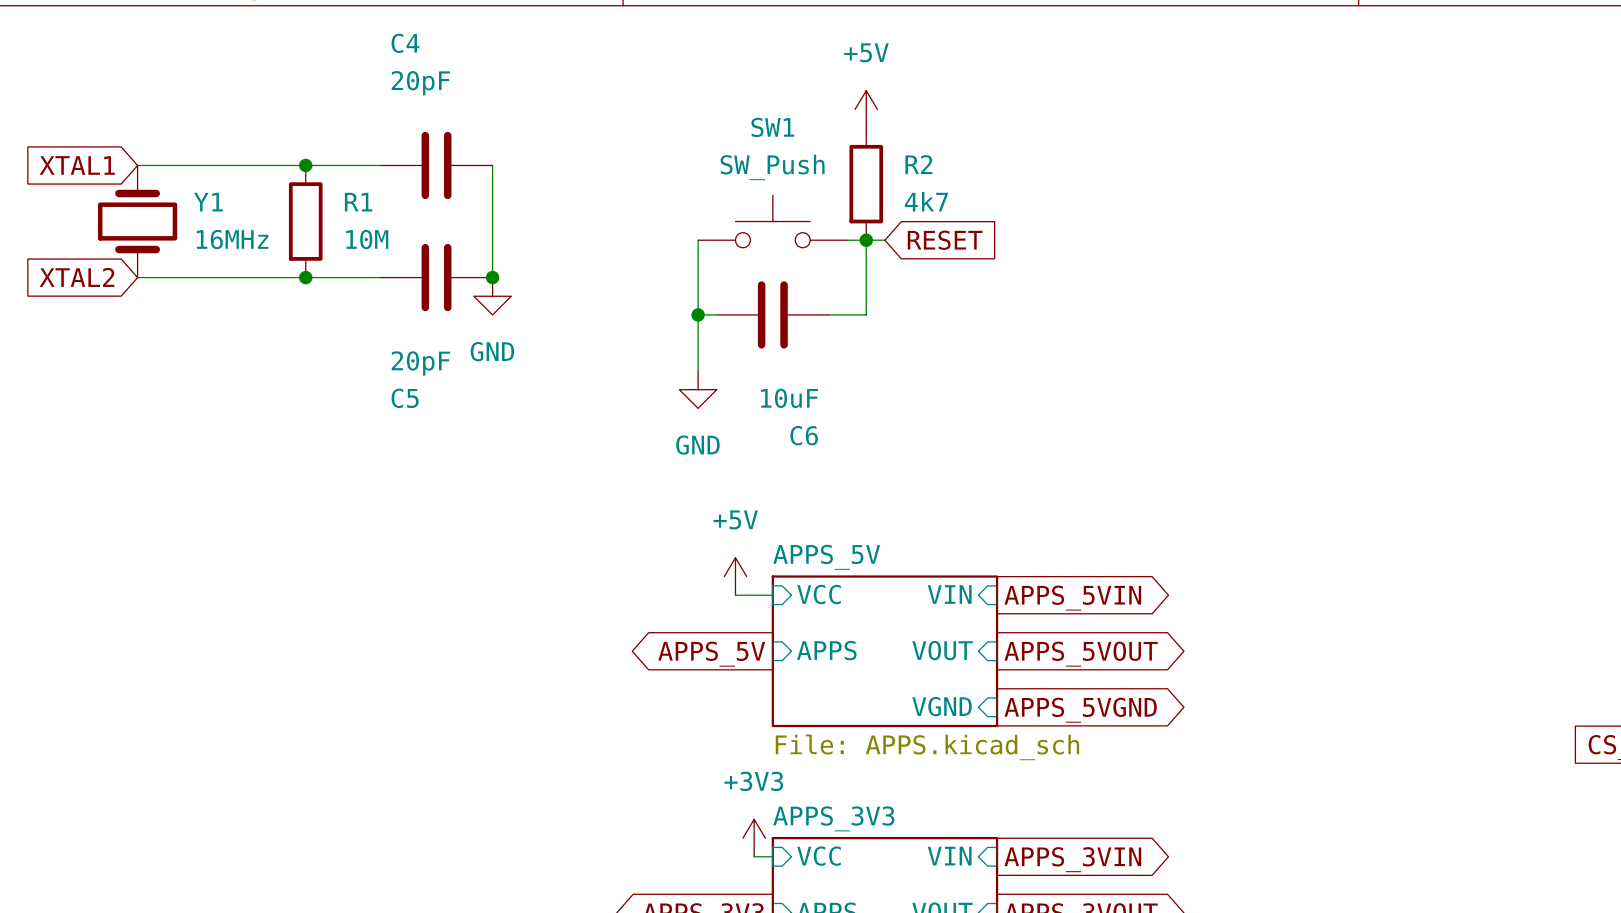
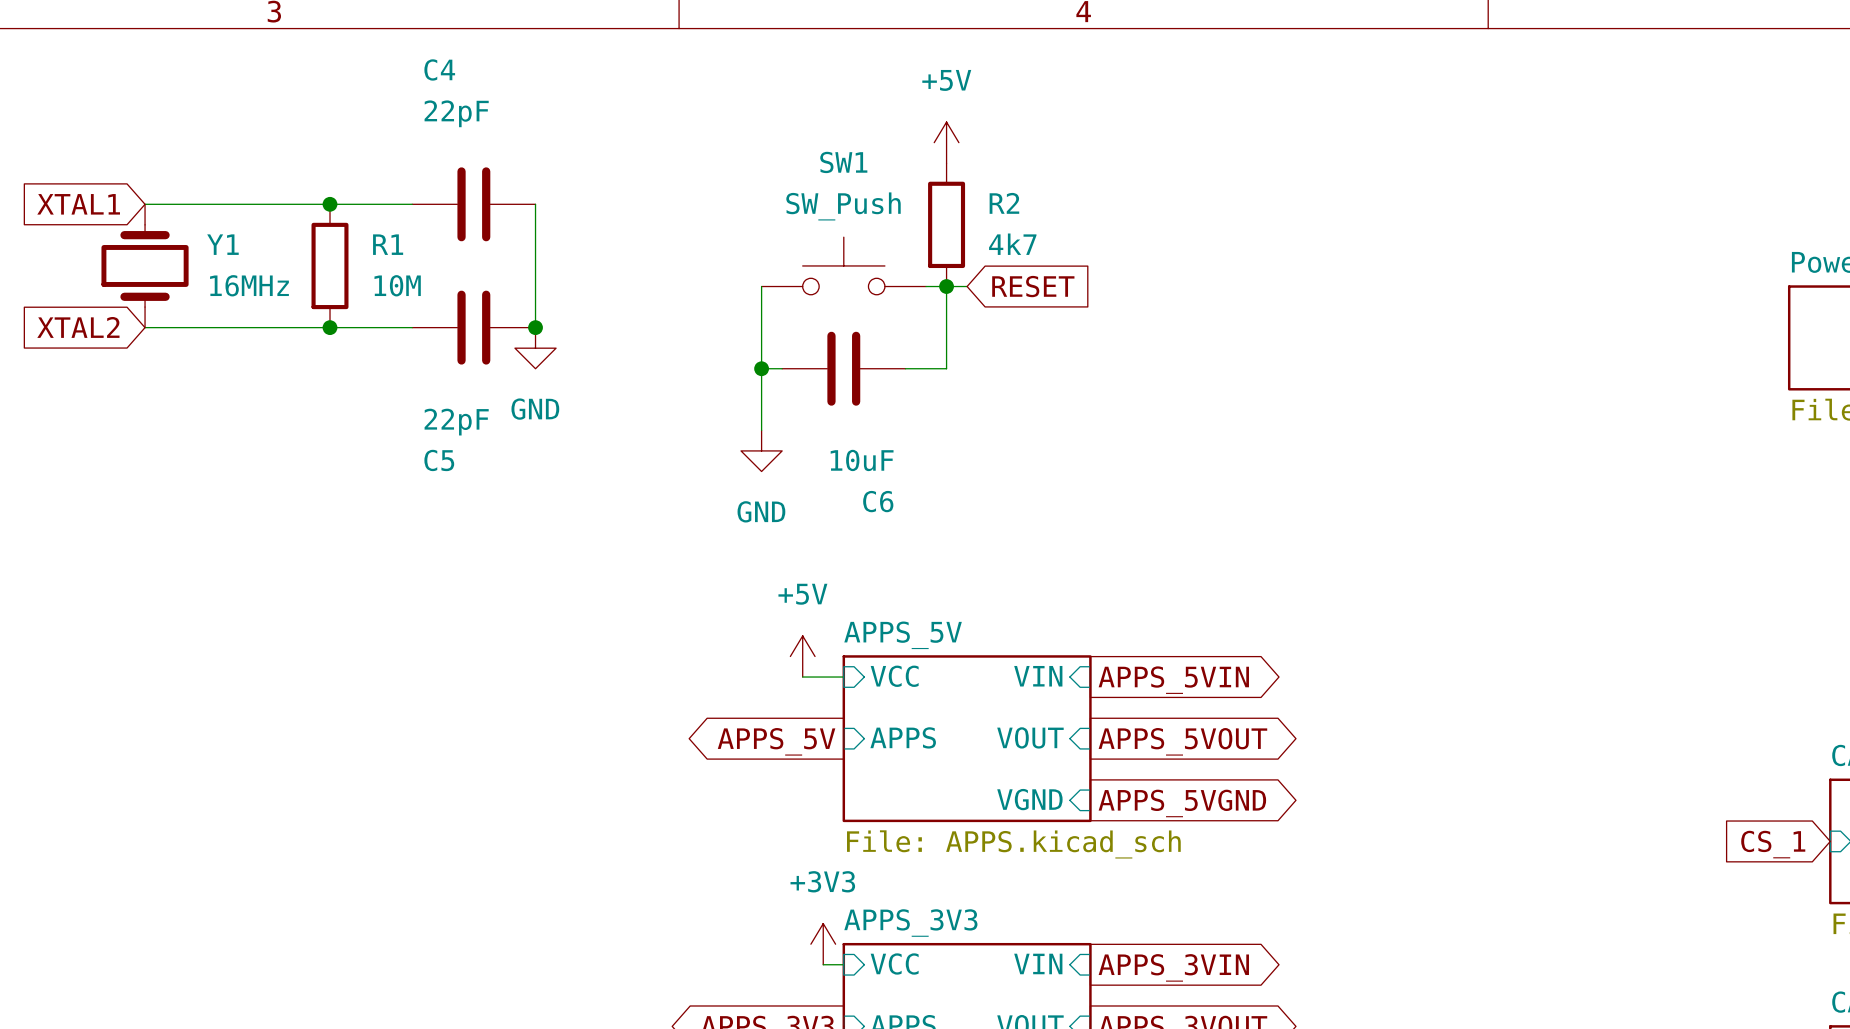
C4 value: 20pF (420, 83) -> 22pF (456, 113)
C5 value: 20pF (420, 363) -> 22pF (456, 422)

